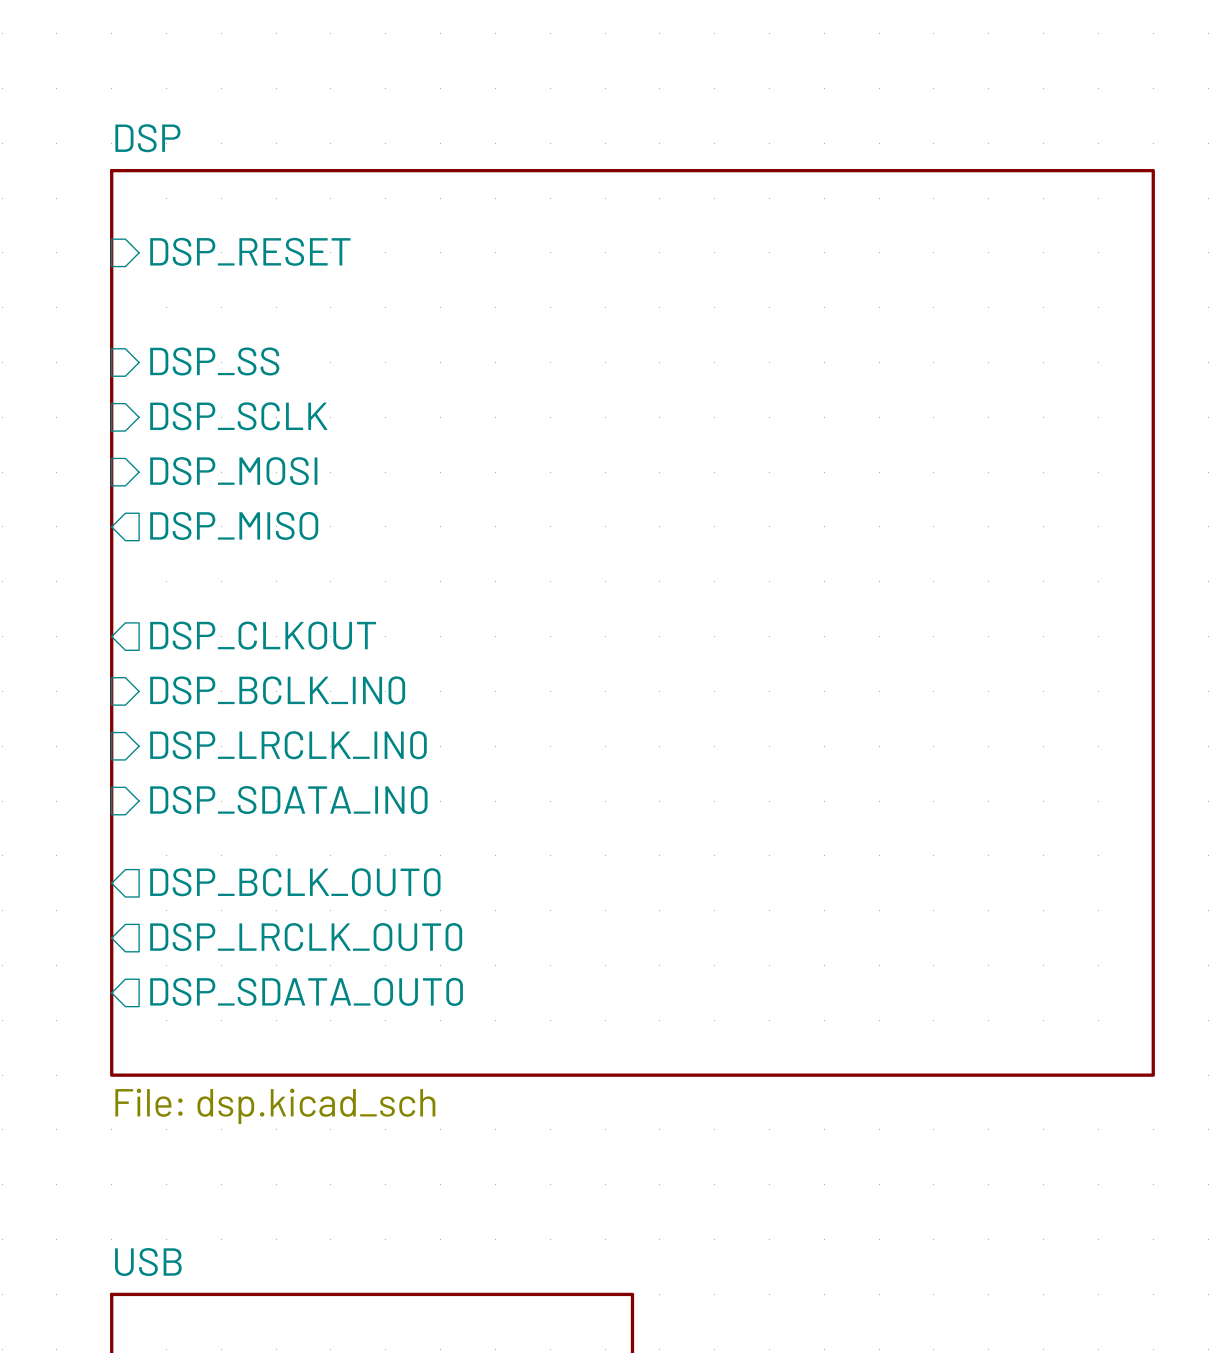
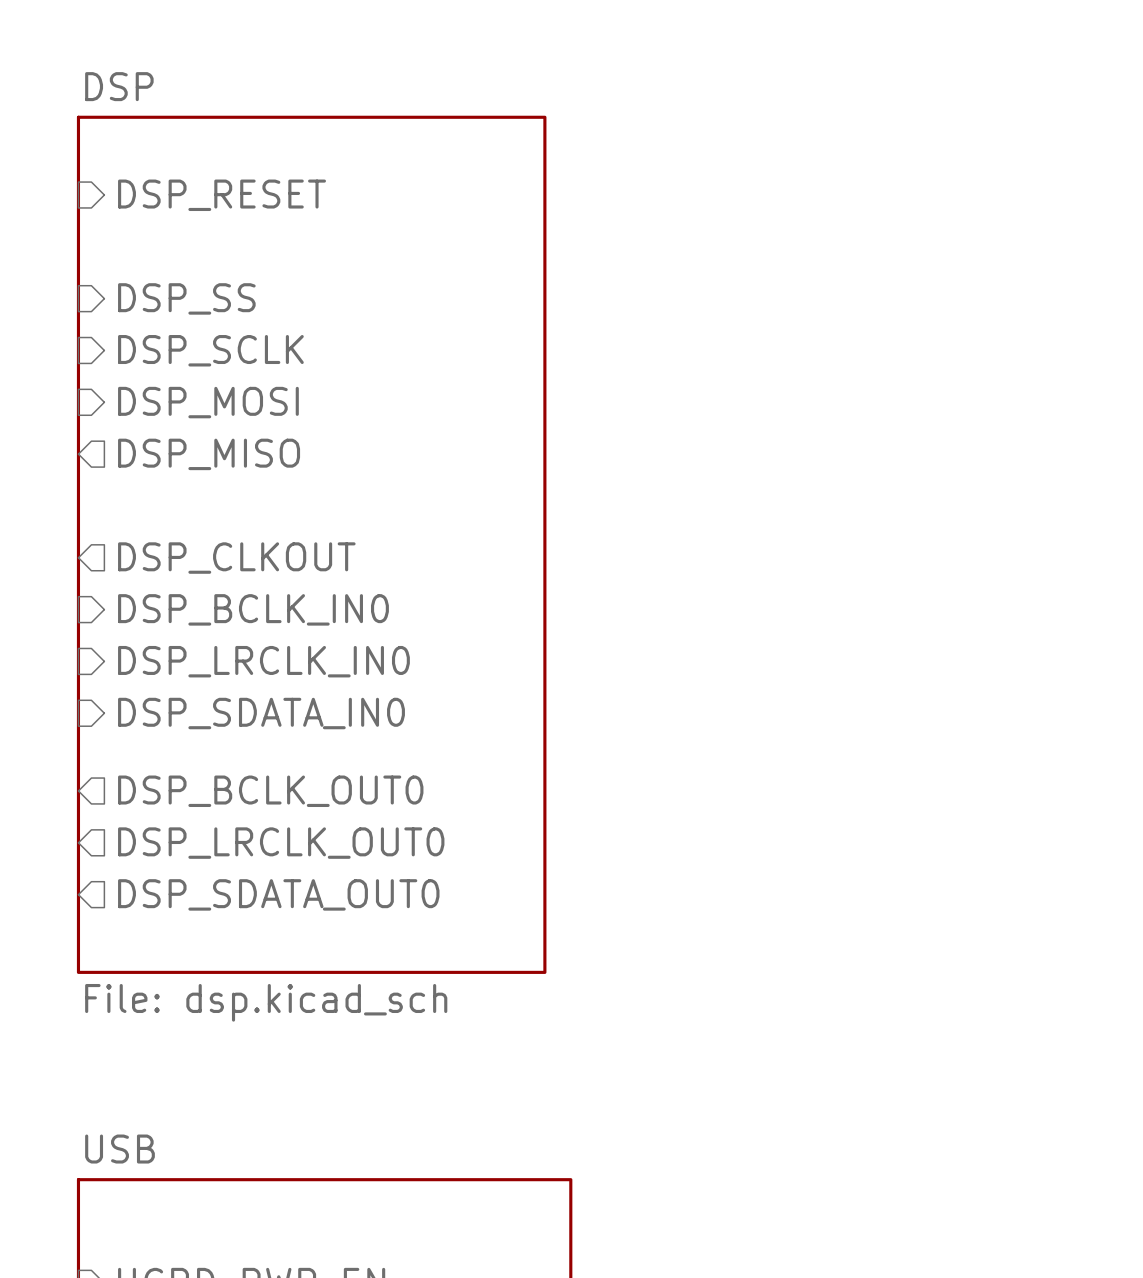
sheet DSP: none -> File: dsp.kicad_sch (311, 544)
sheet DSP: File: dsp.kicad_sch (632, 622) -> none

